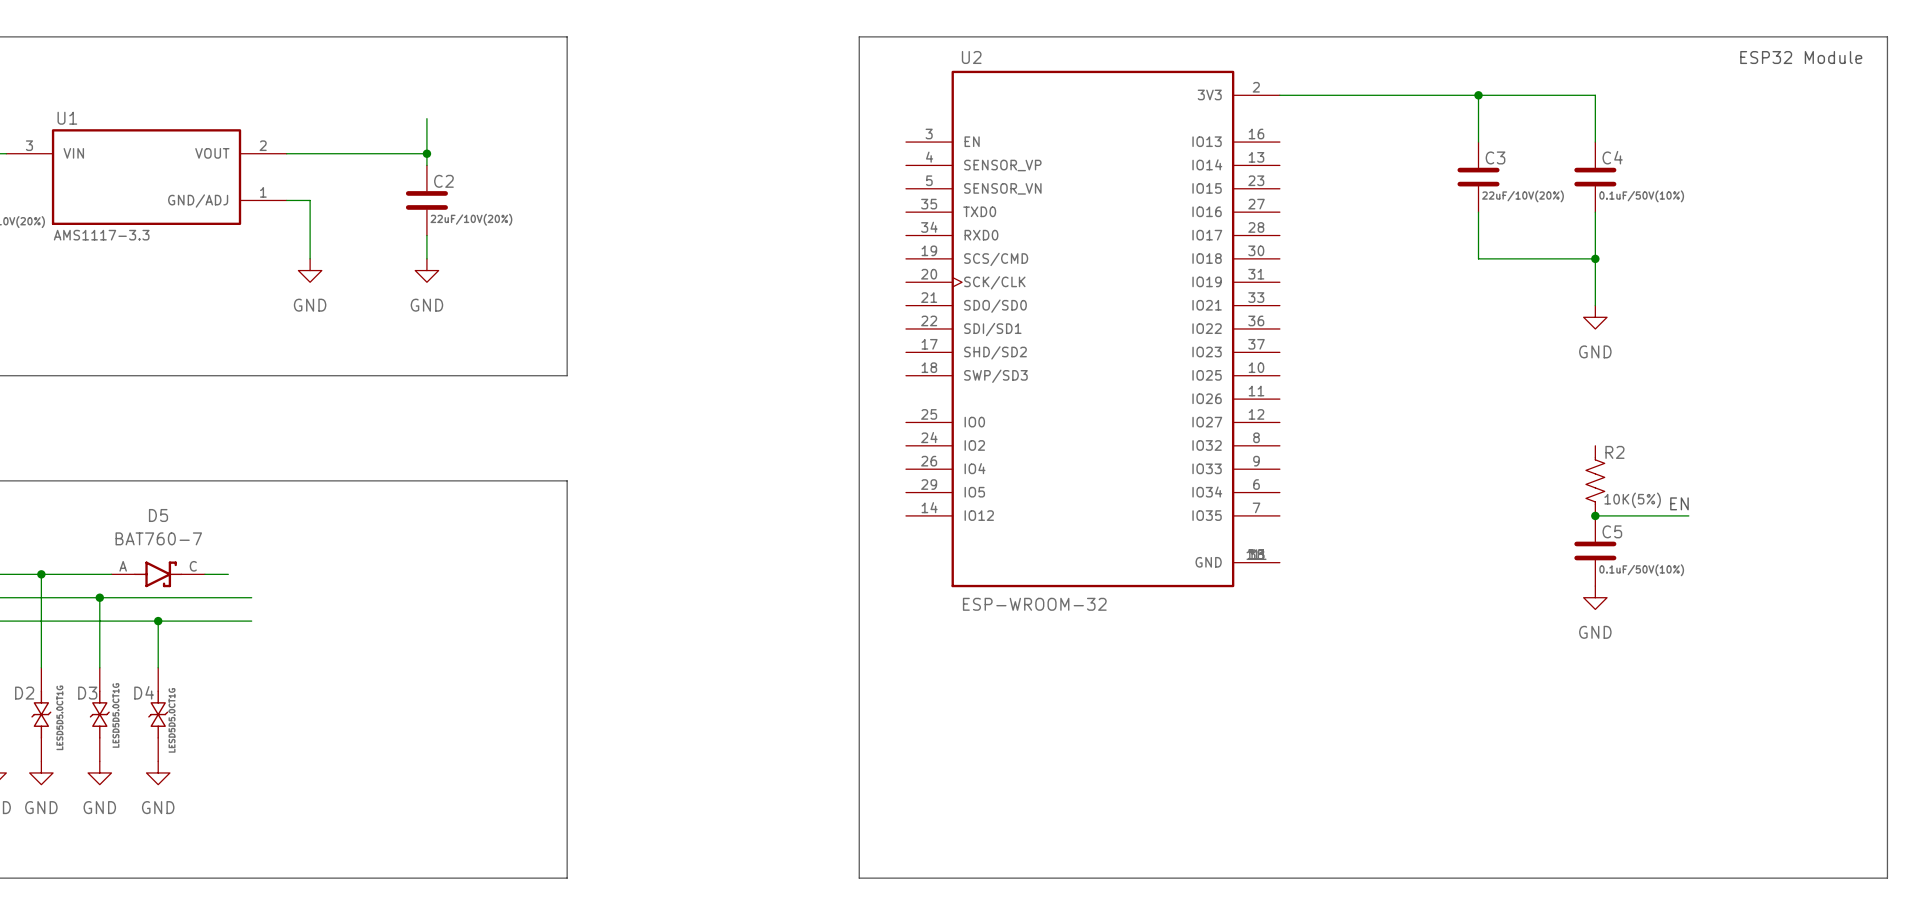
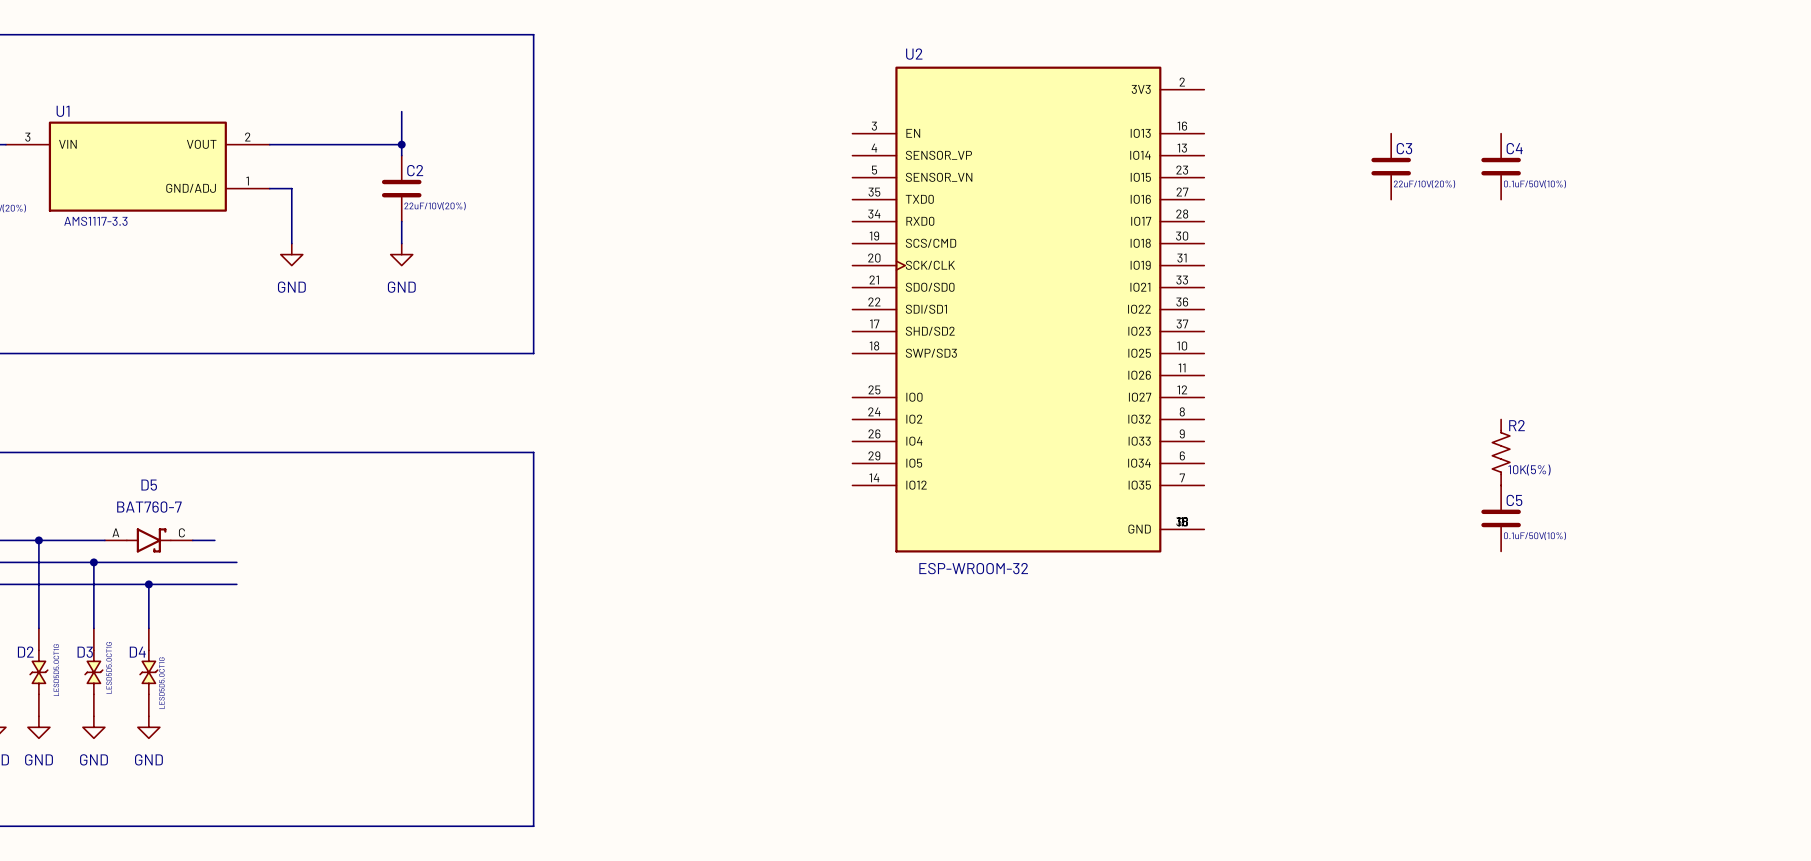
line: (859, 36) (1887, 36) (1887, 878) (859, 878) (859, 36) -> none
text: ESP32 Module (1801, 57) -> none
wire: (1279, 95) (1595, 95) (1595, 142) -> none
wire: (1478, 95) (1478, 142) -> none
junction: (1478, 95) -> none
wire: (1478, 212) (1478, 258) (1595, 258) -> none
wire: (1595, 212) (1595, 305) -> none
junction: (1595, 258) -> none
power symbol: GND (1595, 317) -> none
text: EN (1679, 503) -> none
wire: (1595, 515) (1688, 515) -> none
junction: (1595, 515) -> none
power symbol: GND (1595, 597) -> none

